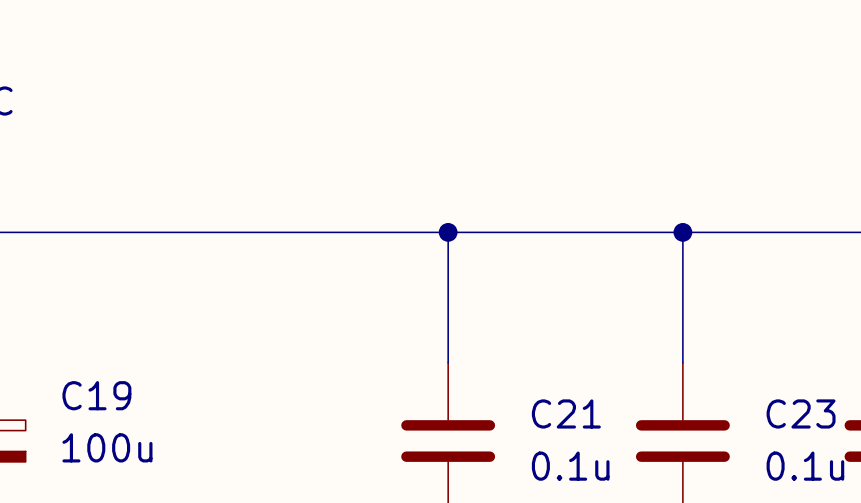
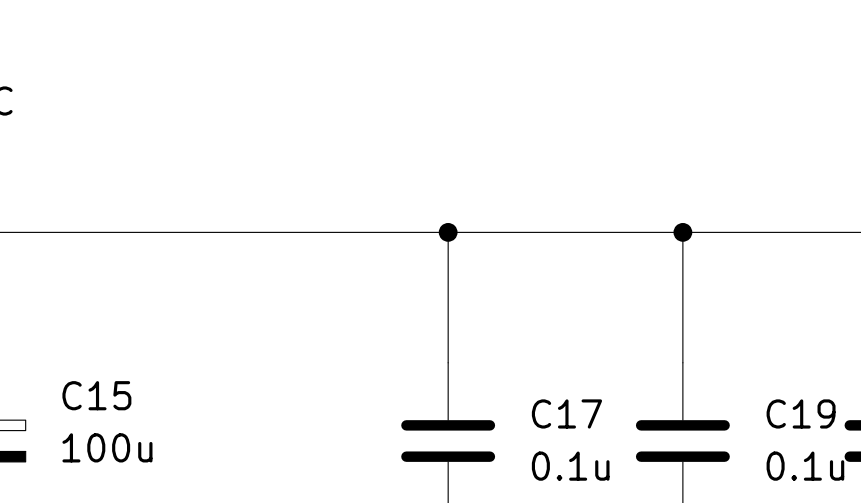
C19 name: C19 (96, 395) -> C15 (96, 395)
C21 name: C21 (566, 413) -> C17 (566, 413)
C23 name: C23 (801, 413) -> C19 (801, 413)

